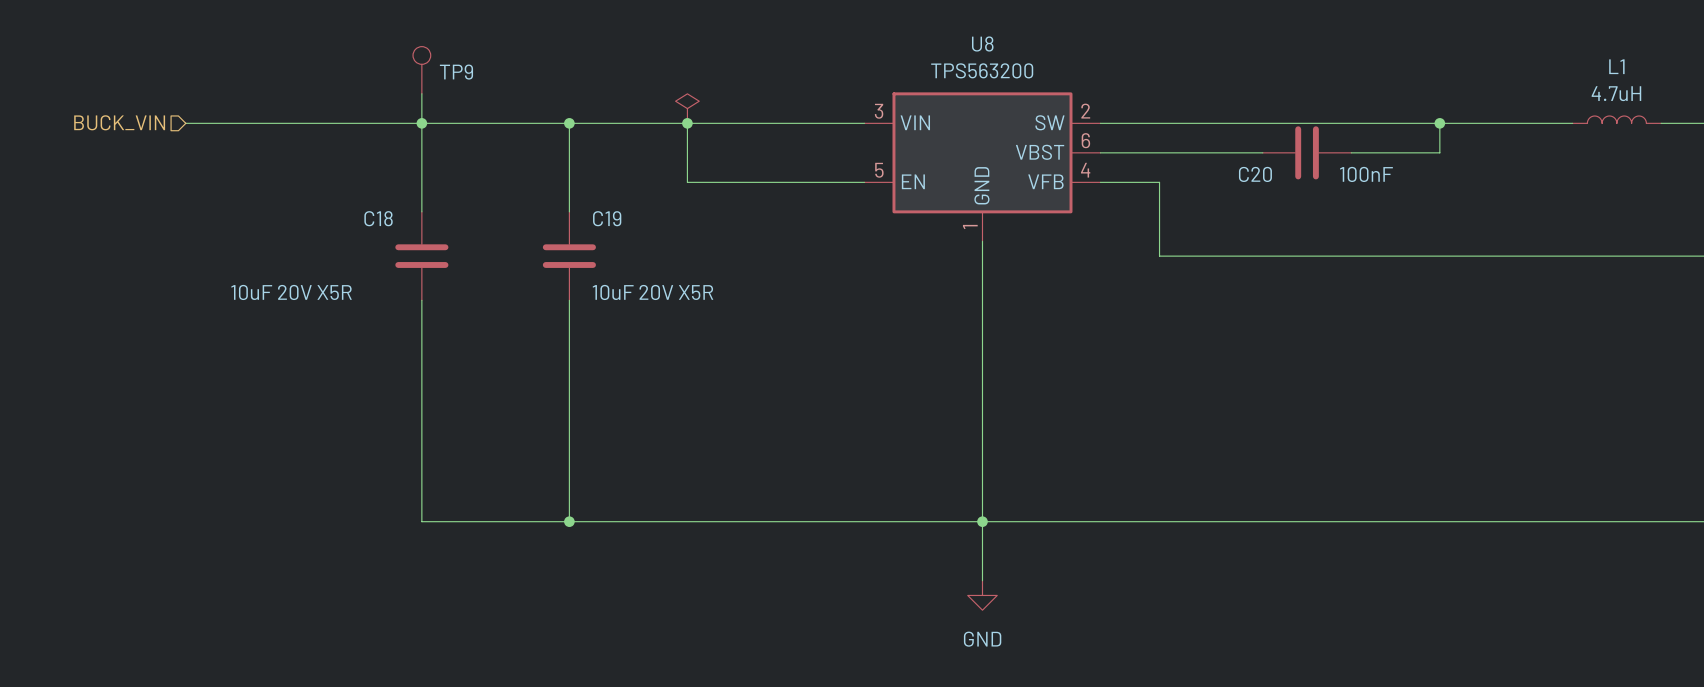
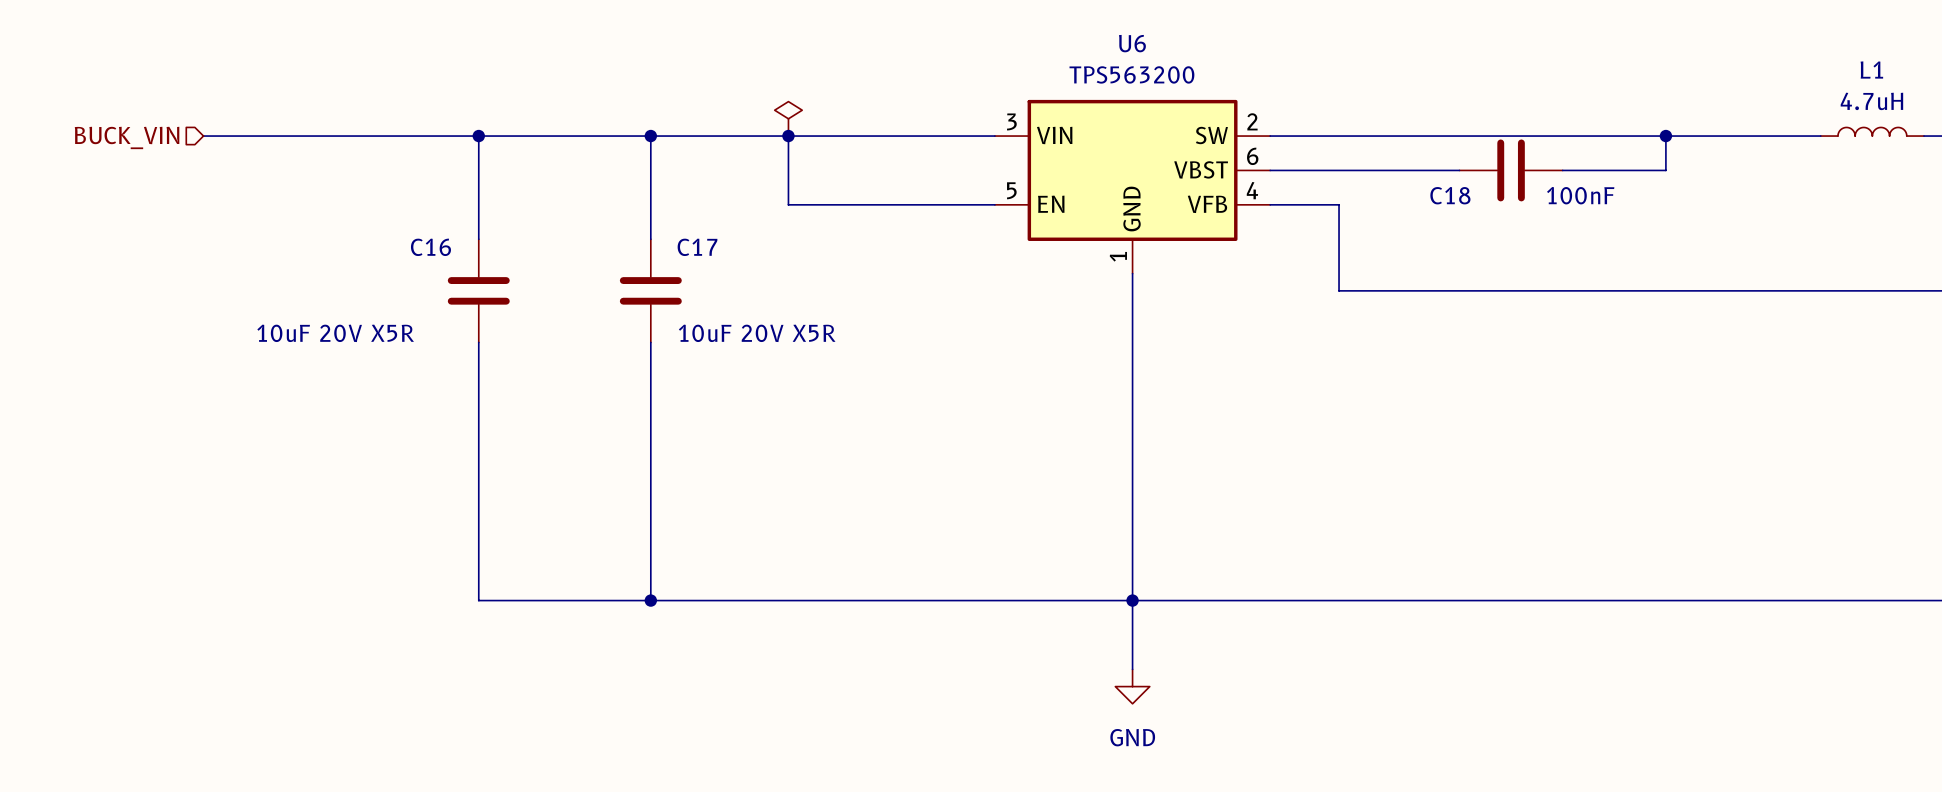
U8 name: U8 (982, 43) -> U6 (1132, 43)
TP9: (421, 70) -> none
wire: (421, 93) (421, 123) -> none
C20 name: C20 (1255, 174) -> C18 (1450, 195)
C18 name: C18 (378, 218) -> C16 (430, 247)
C19 name: C19 (607, 218) -> C17 (697, 247)

